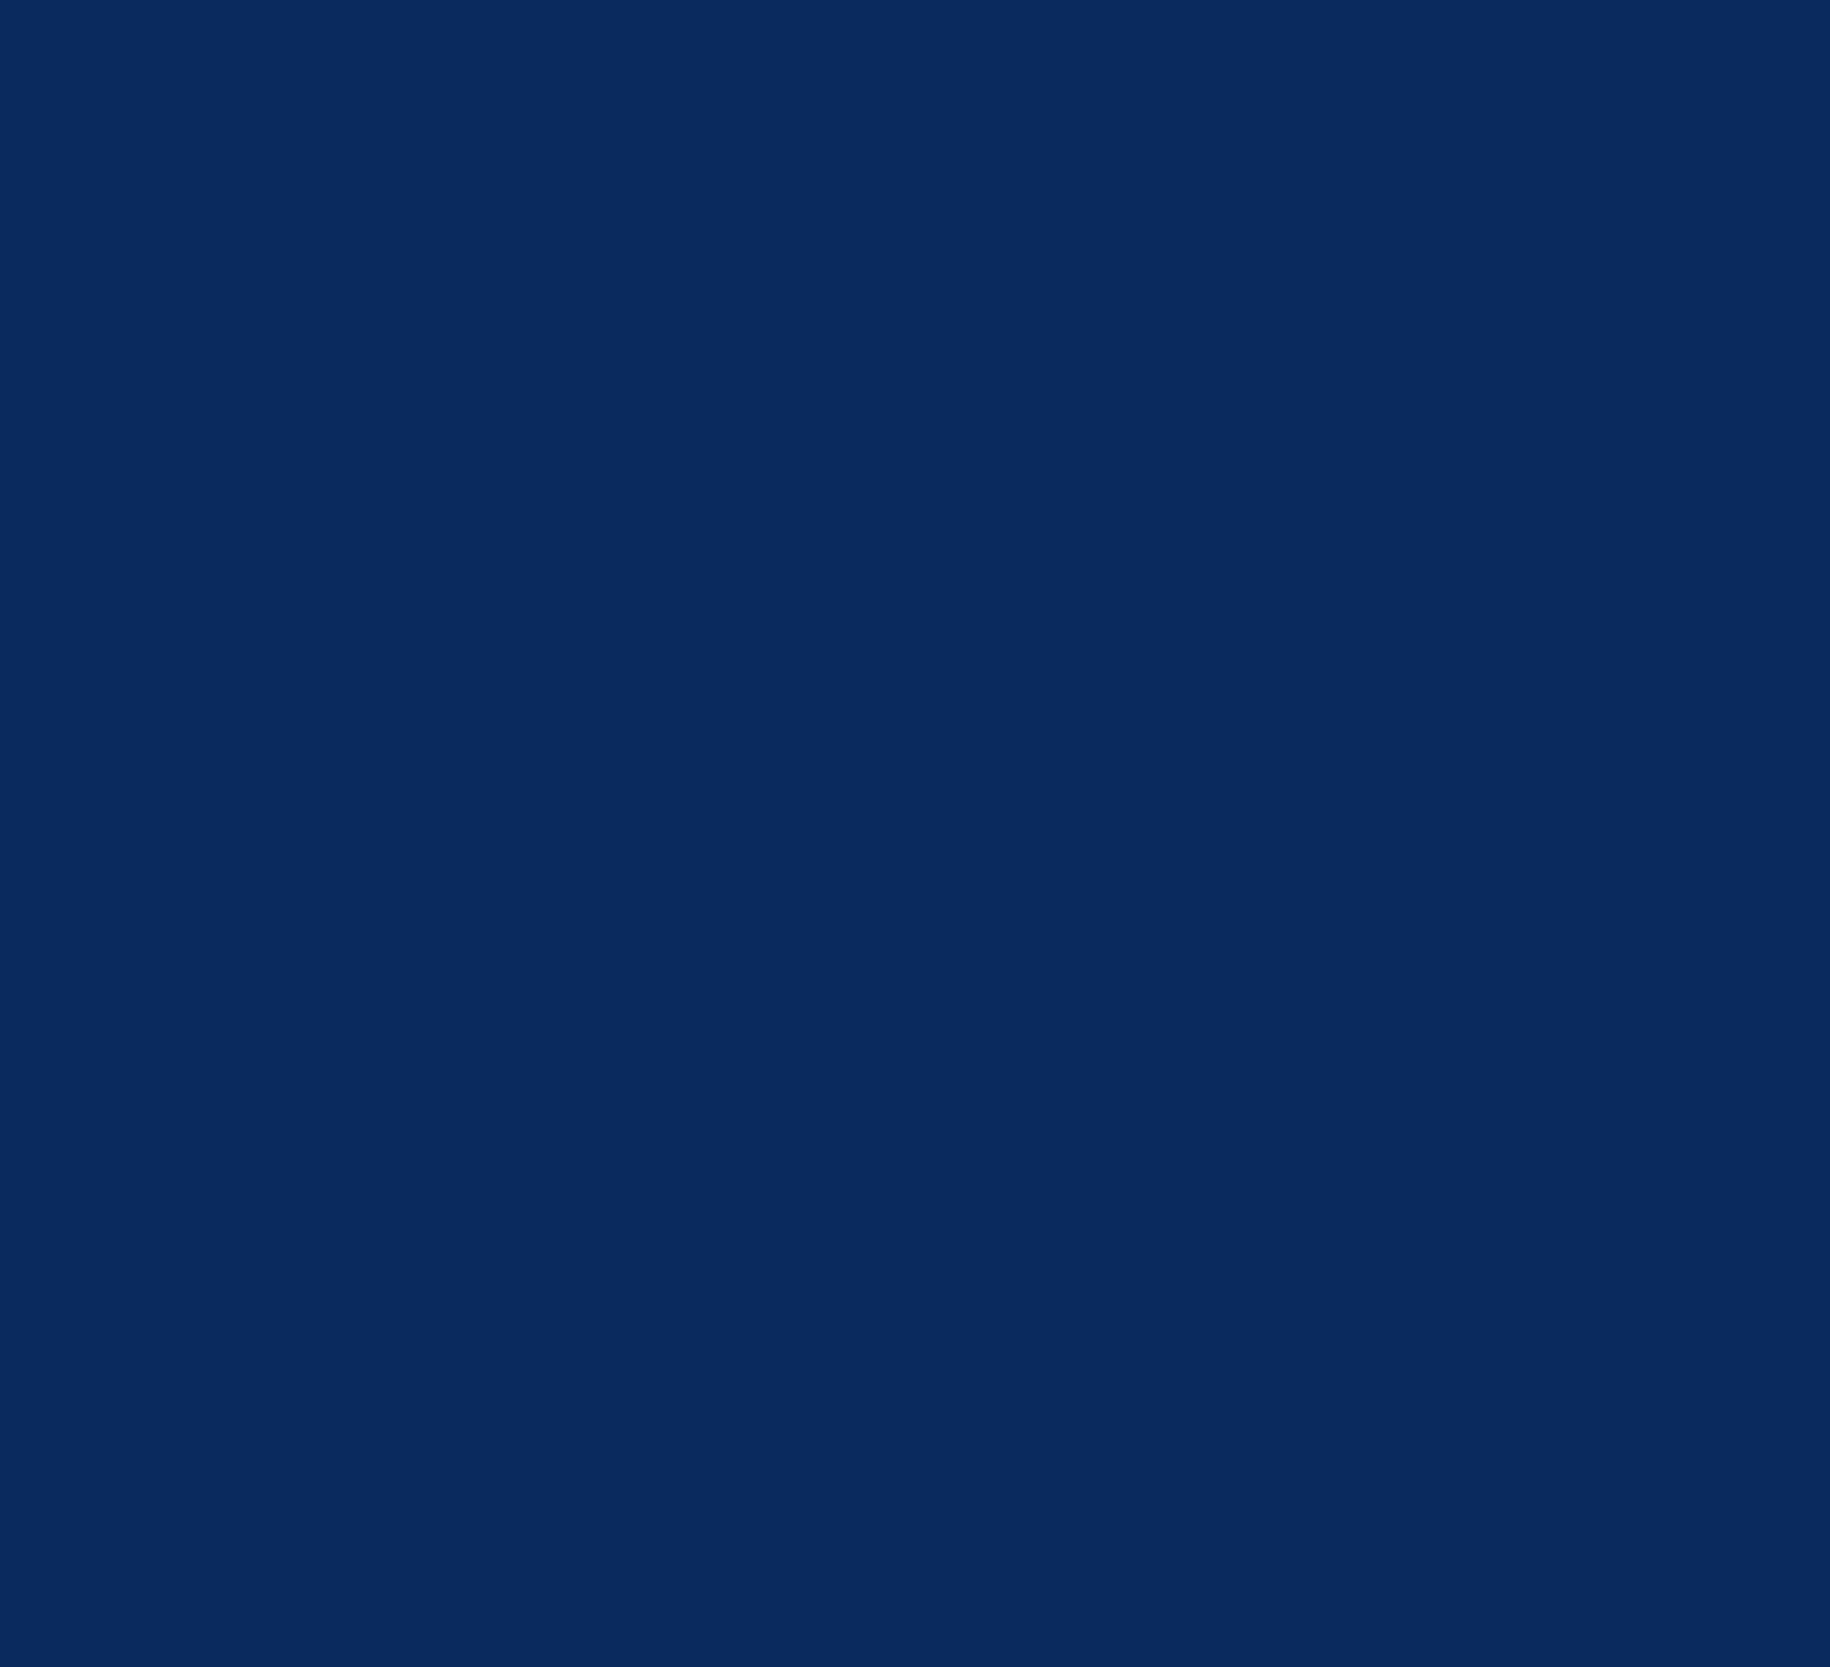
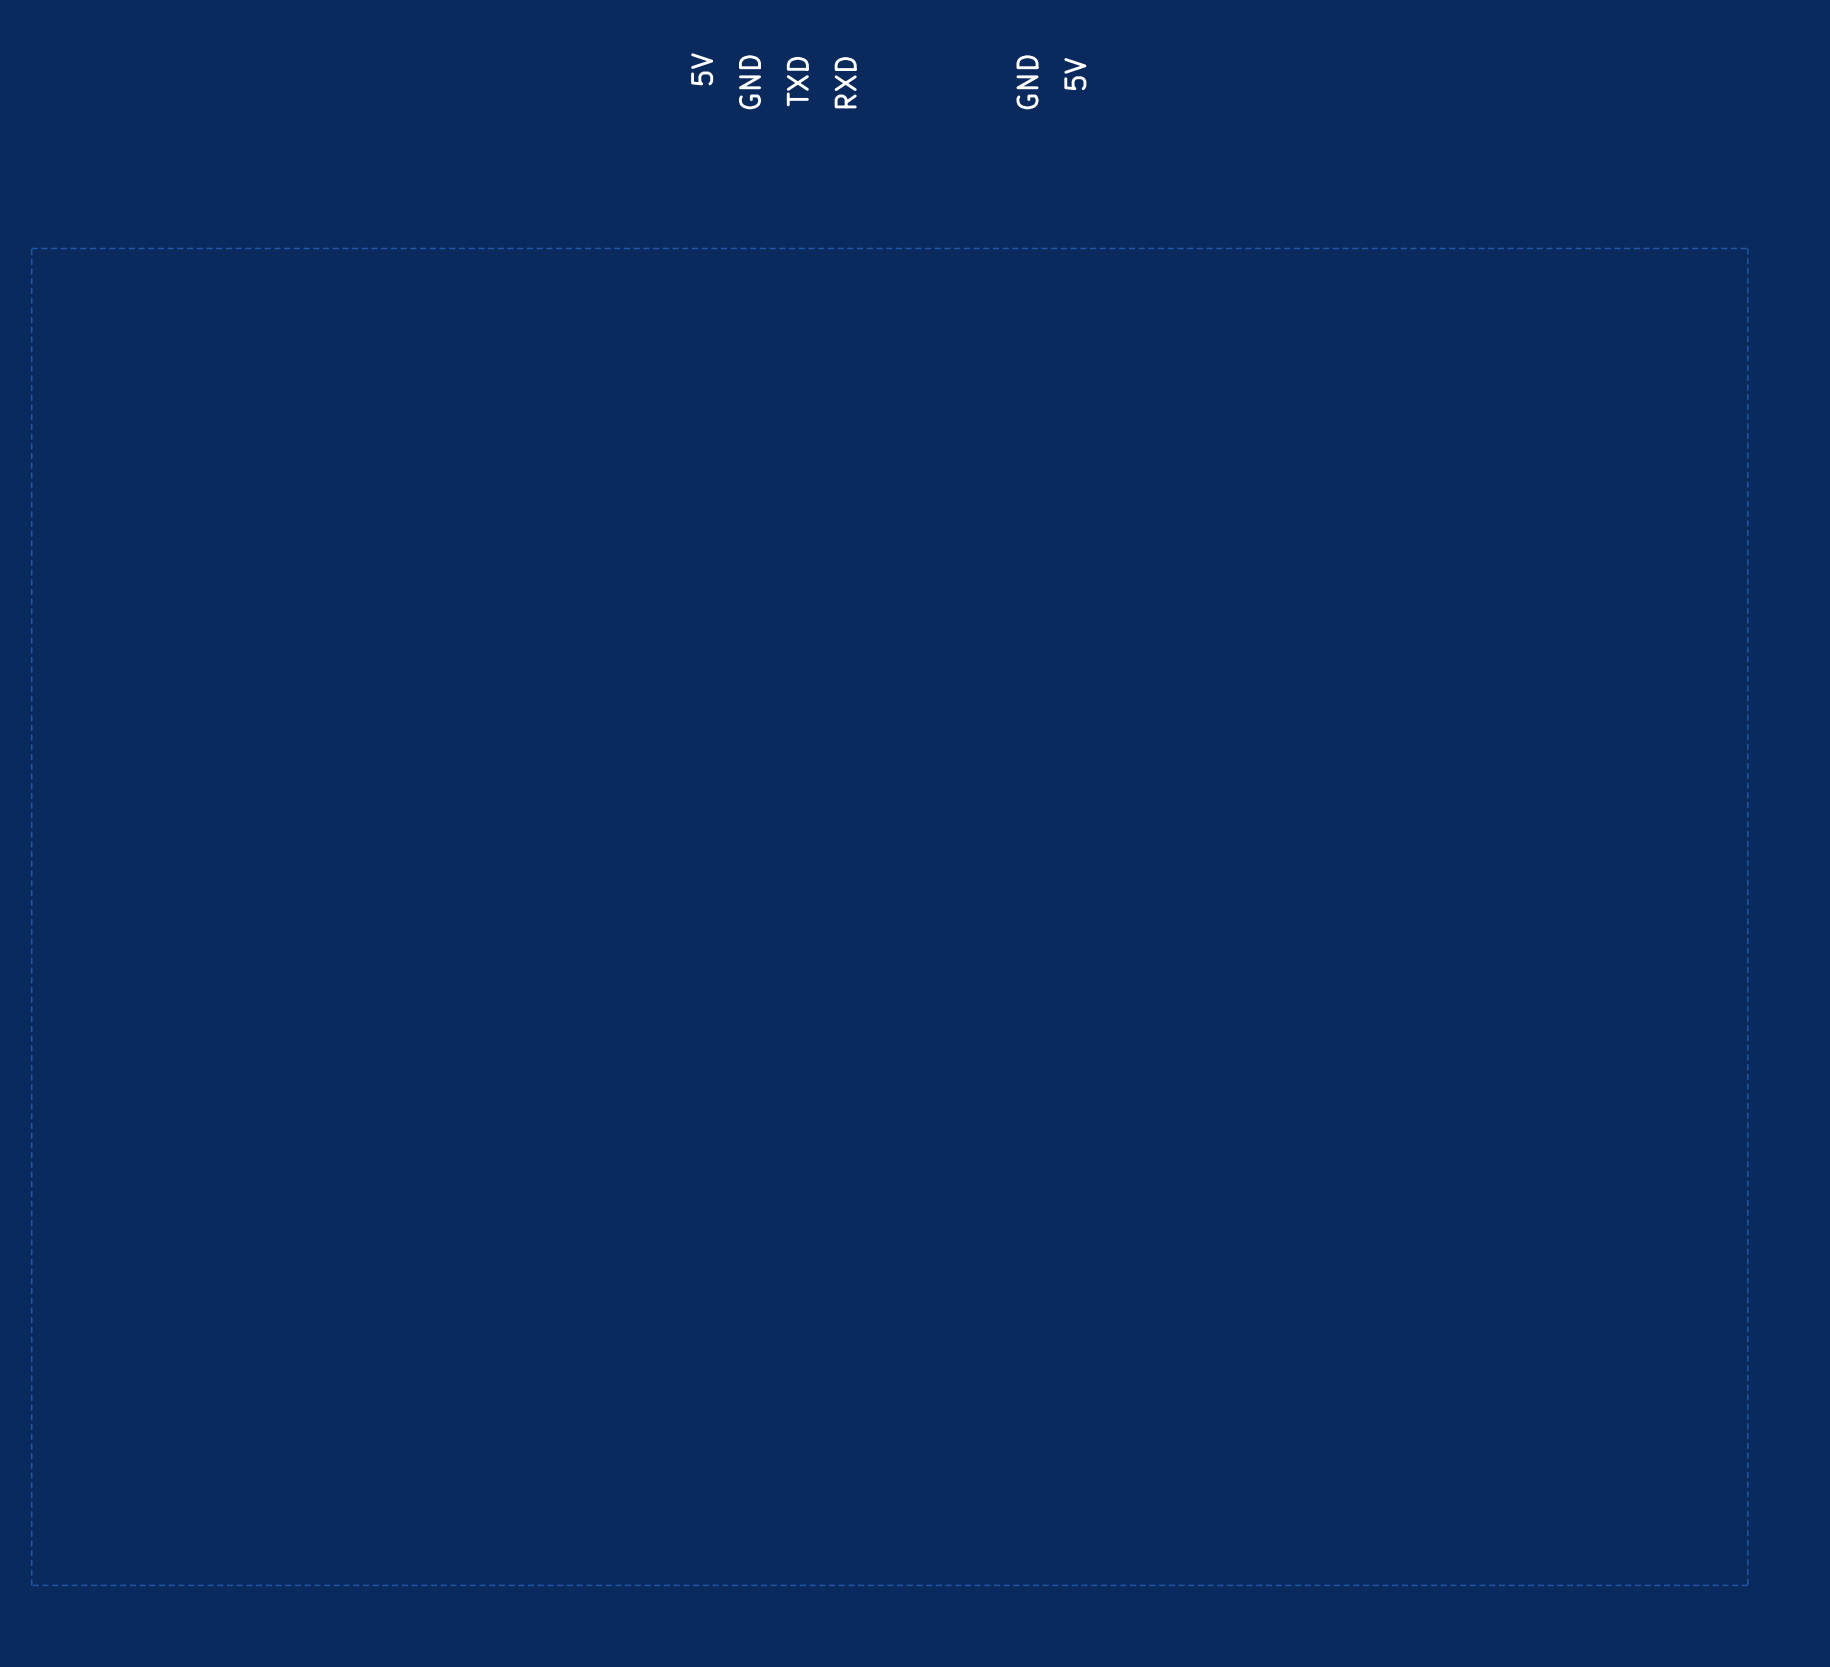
text: none -> 5V (702, 69)
text: none -> 5V (1075, 74)
text: none -> TXD (797, 81)
text: none -> GND (749, 82)
text: none -> RXD (845, 82)
text: none -> GND (1027, 82)
zone outline: none -> (31, 248) (1747, 248) (1747, 1585) (31, 1585) (31, 248)

